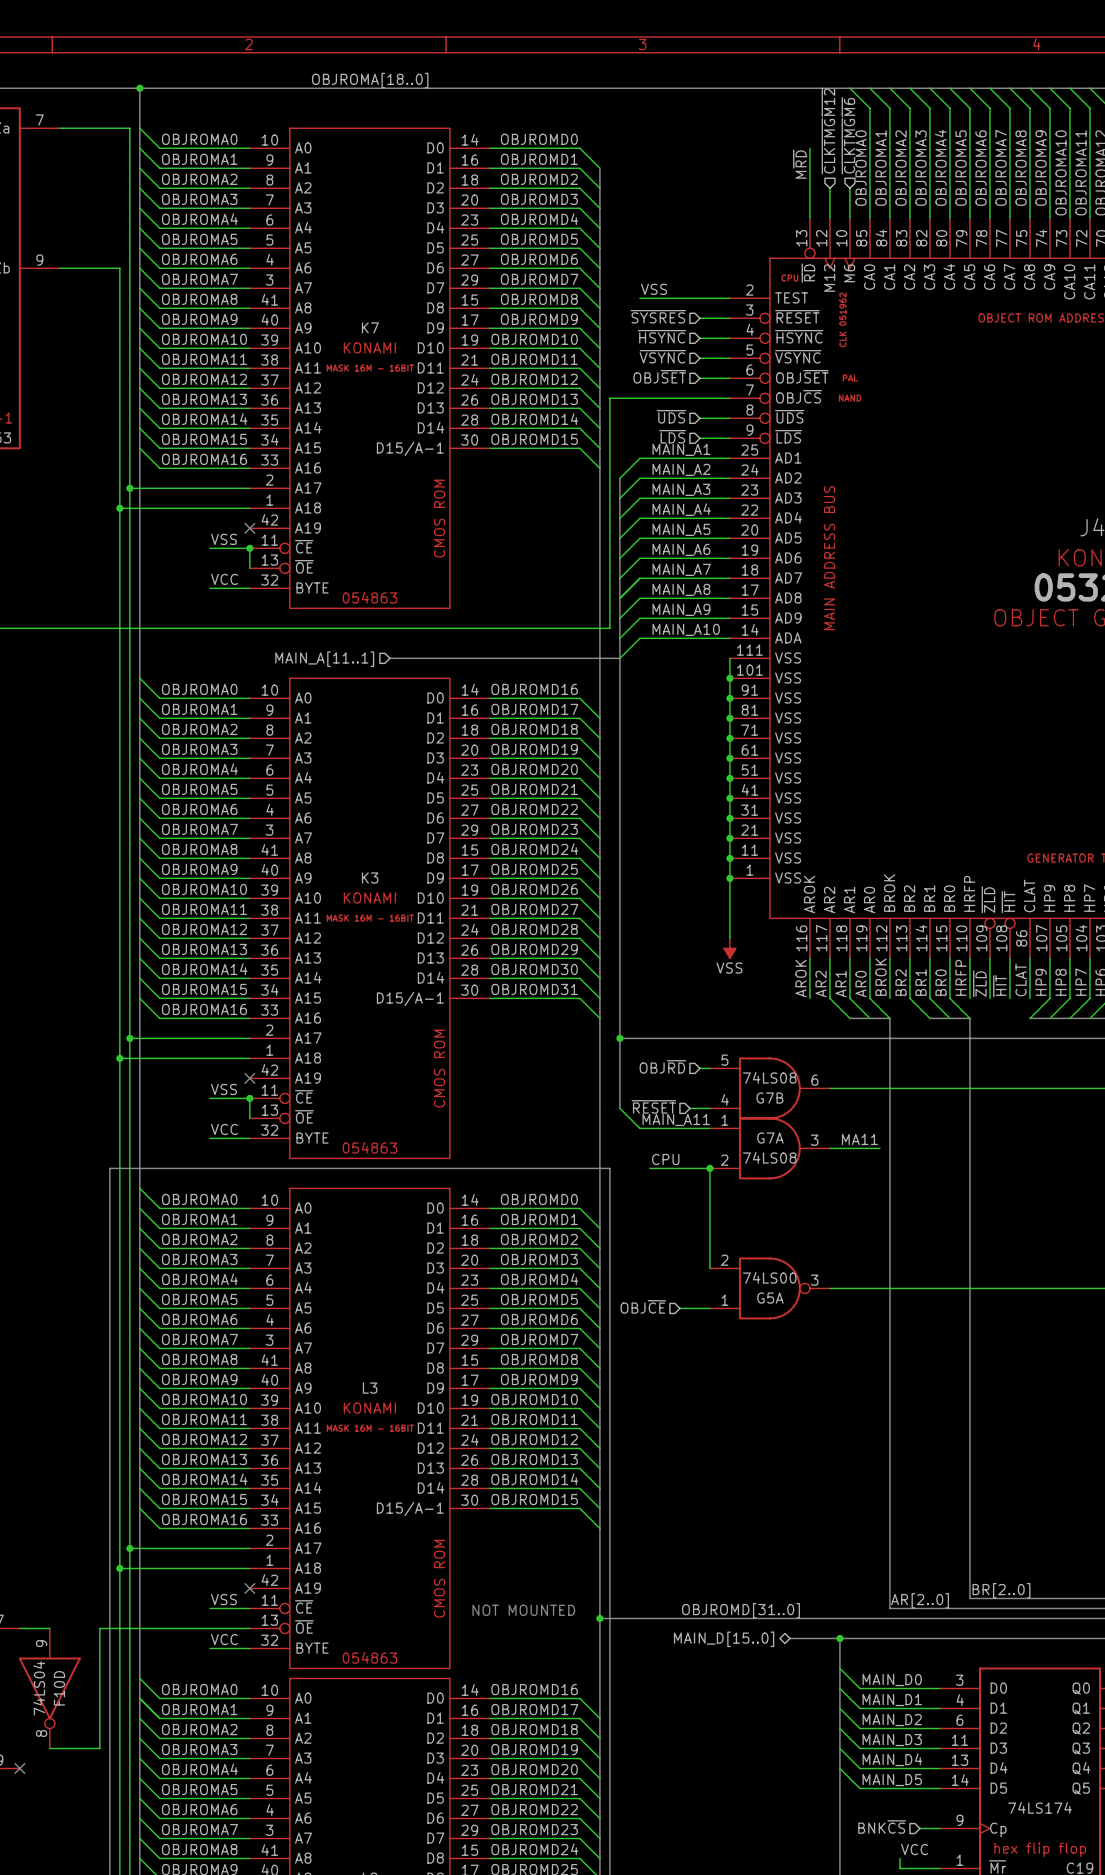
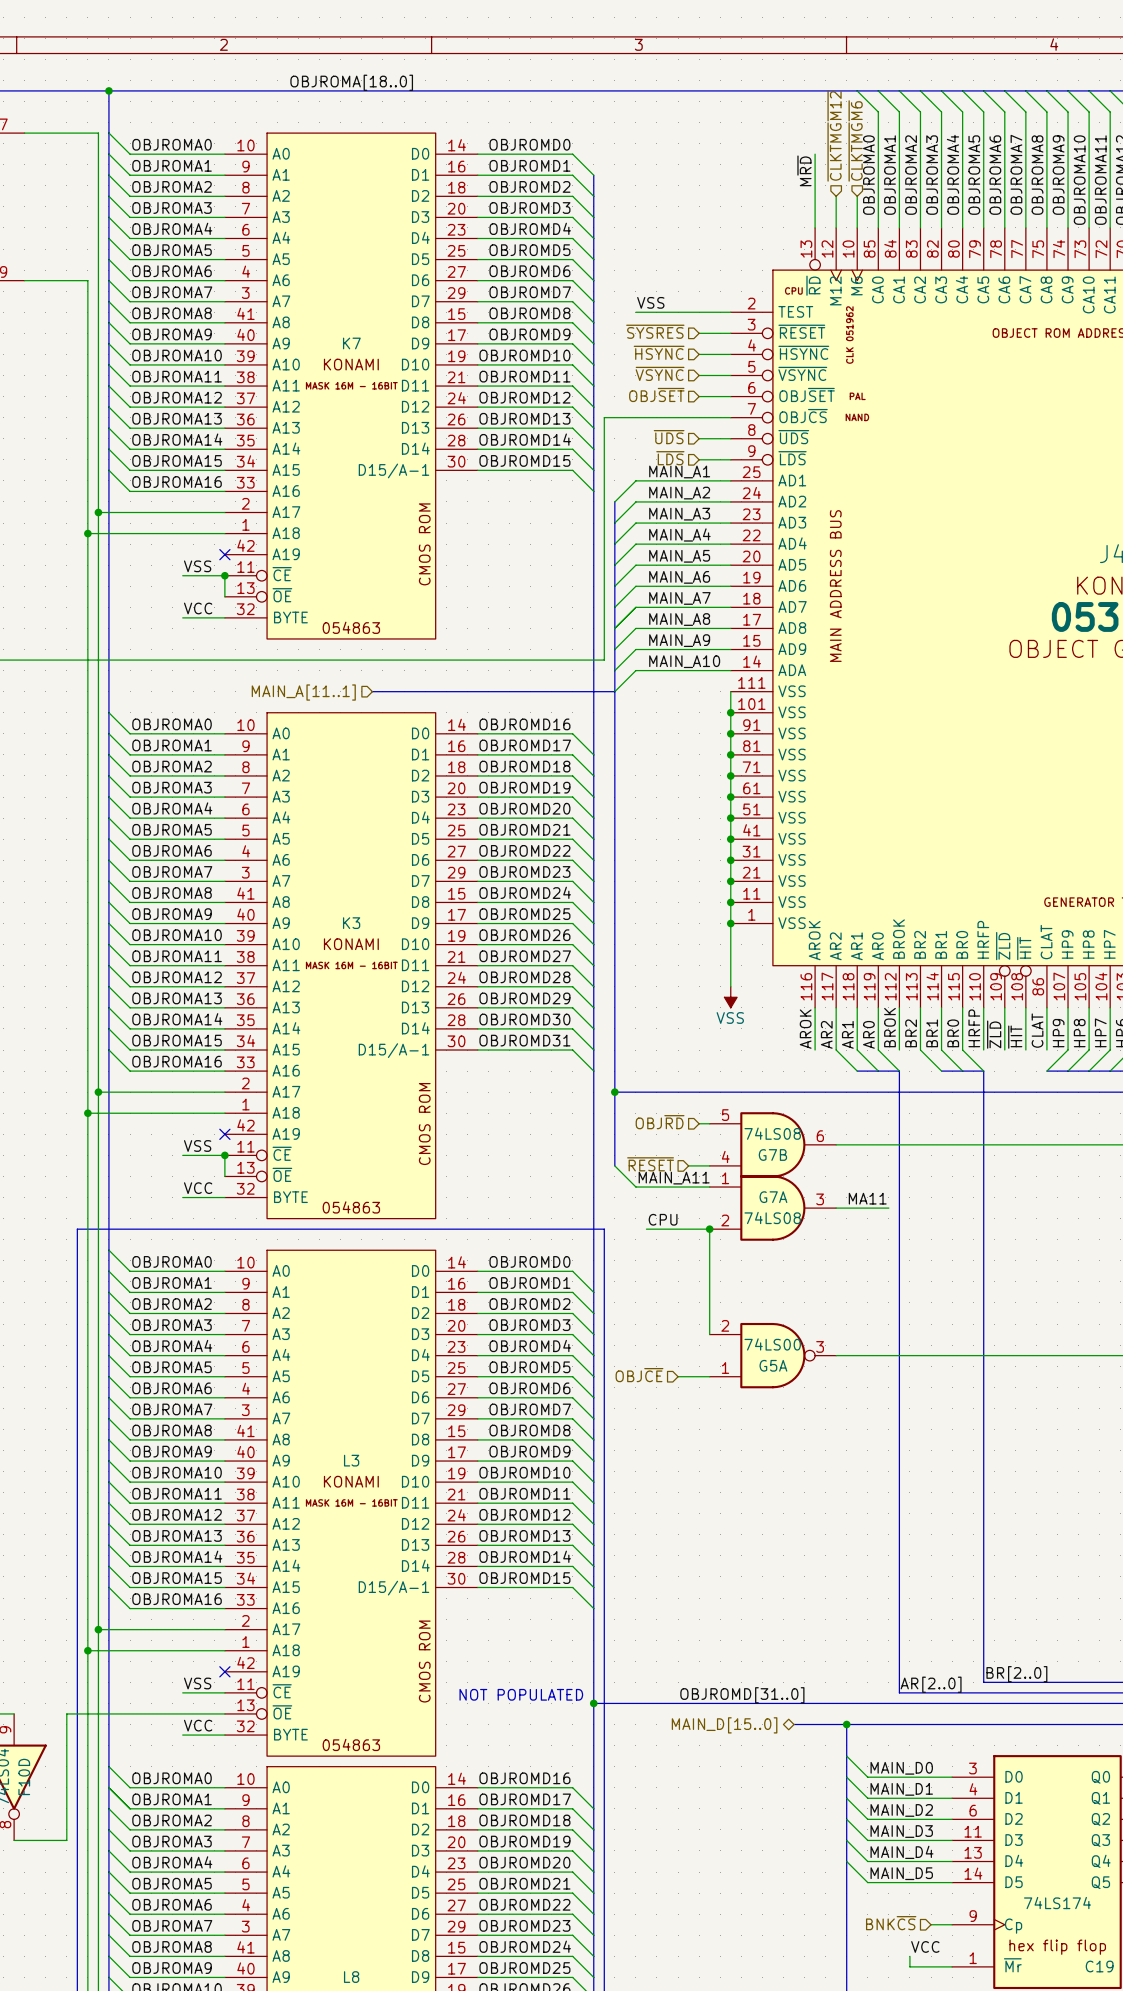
text: NOT MOUNTED (523, 1610) -> NOT POPULATED (521, 1694)

